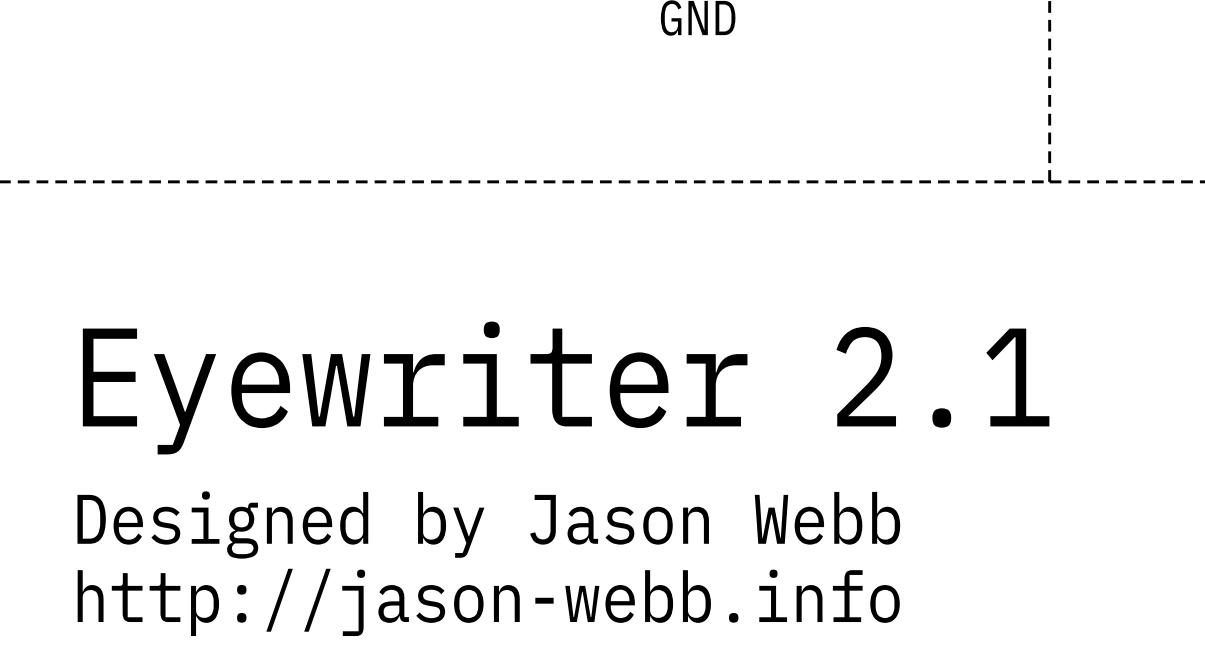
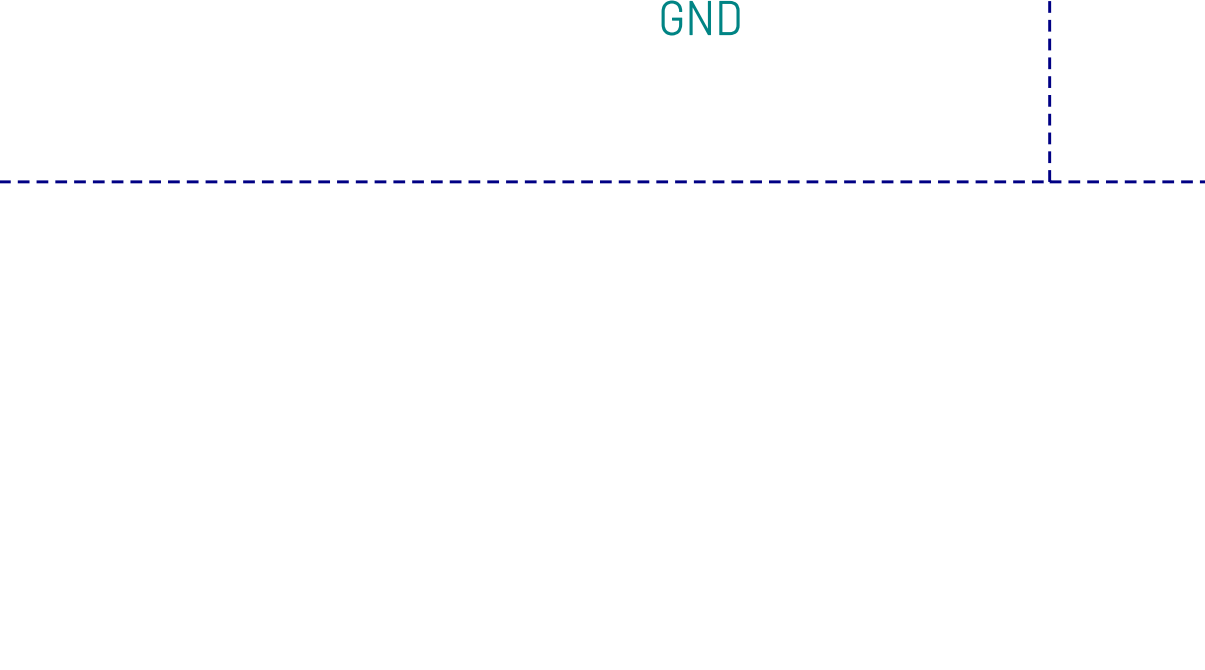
text: Eyewriter 2.1 (566, 388) -> none
text: Designed by Jason Webb (488, 525) -> none
text: http://jason-webb.info (488, 602) -> none

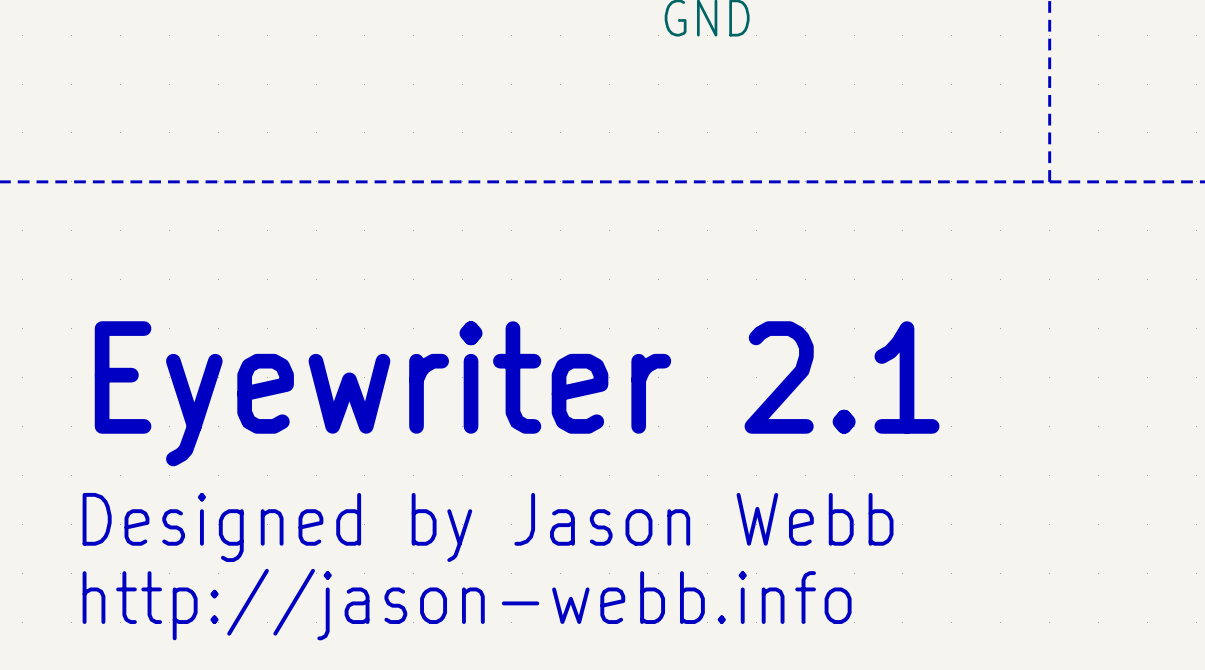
text: none -> Eyewriter 2.1 (517, 393)
text: none -> Designed by Jason Webb (488, 527)
text: none -> http://jason-webb.info (467, 604)

